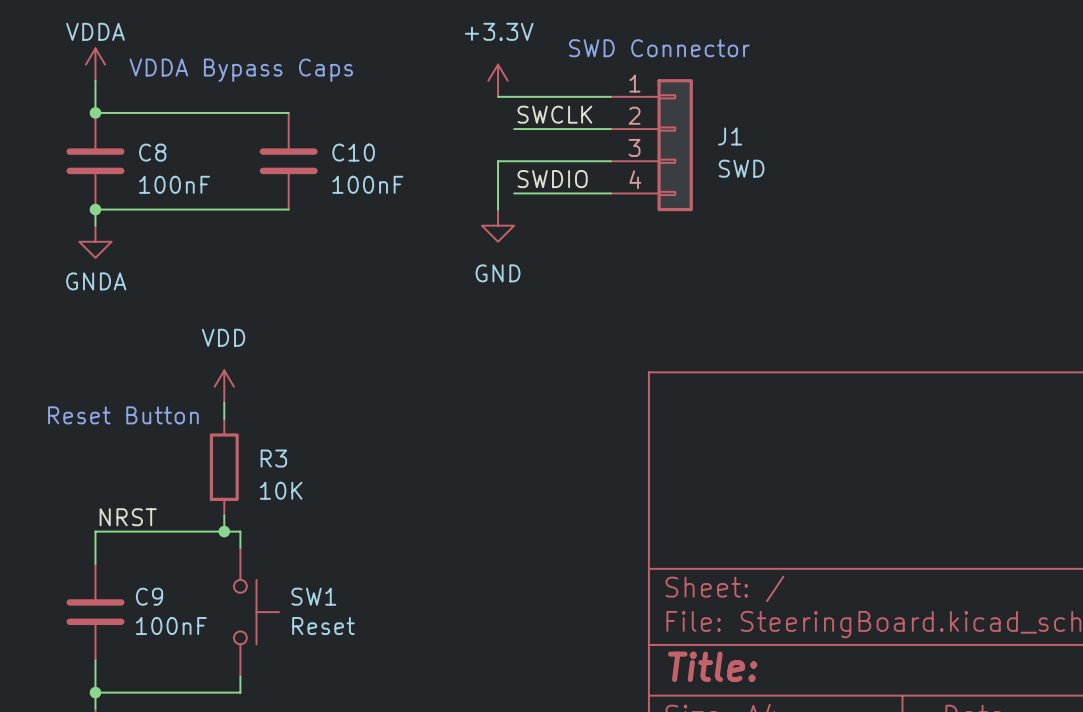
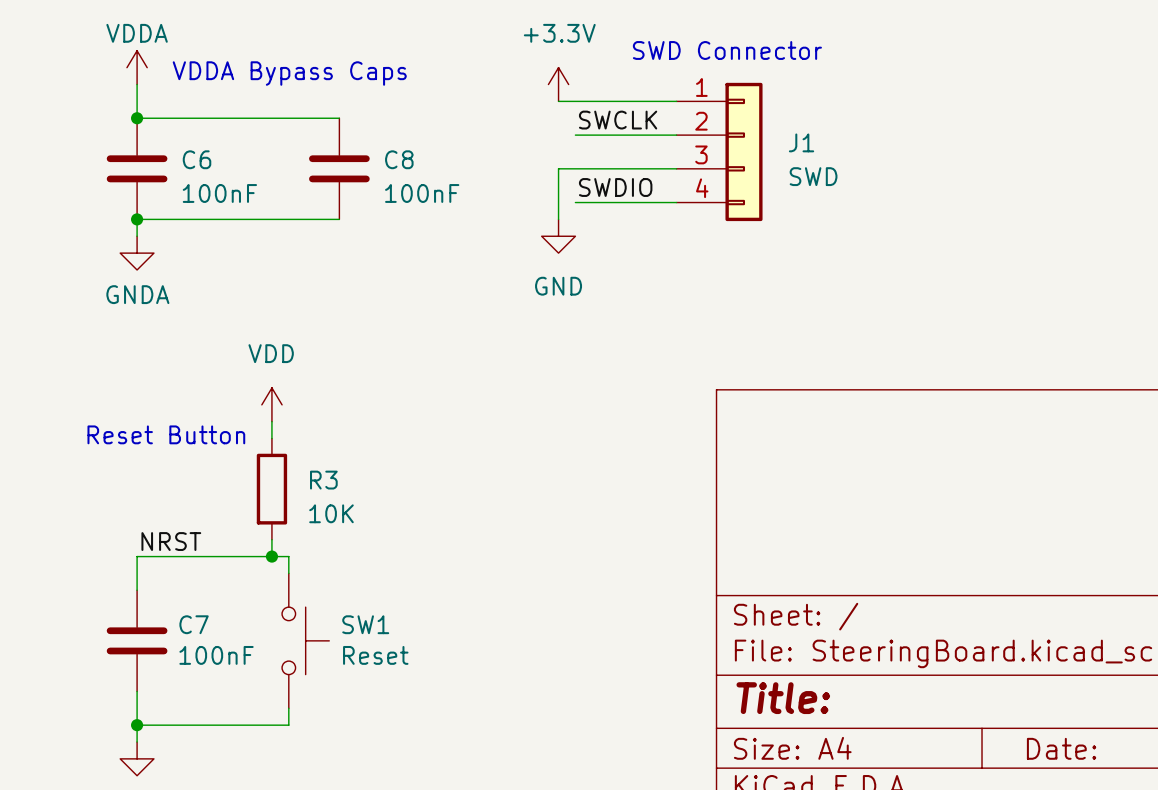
C8 name: C8 (152, 152) -> C6 (197, 159)
C10 name: C10 (353, 152) -> C8 (399, 159)
C9 name: C9 (149, 596) -> C7 (194, 624)

